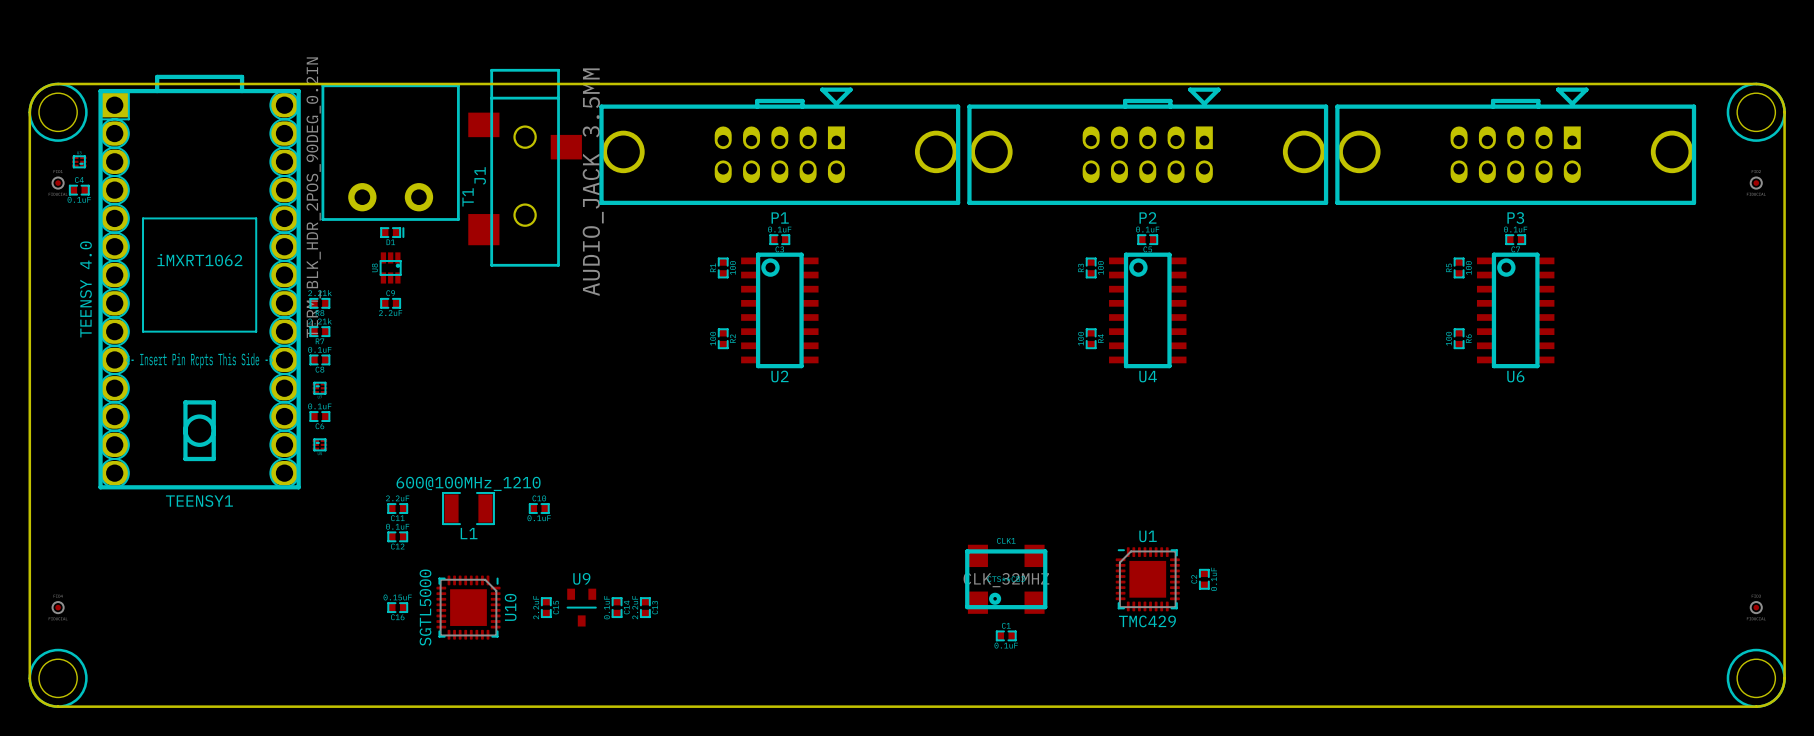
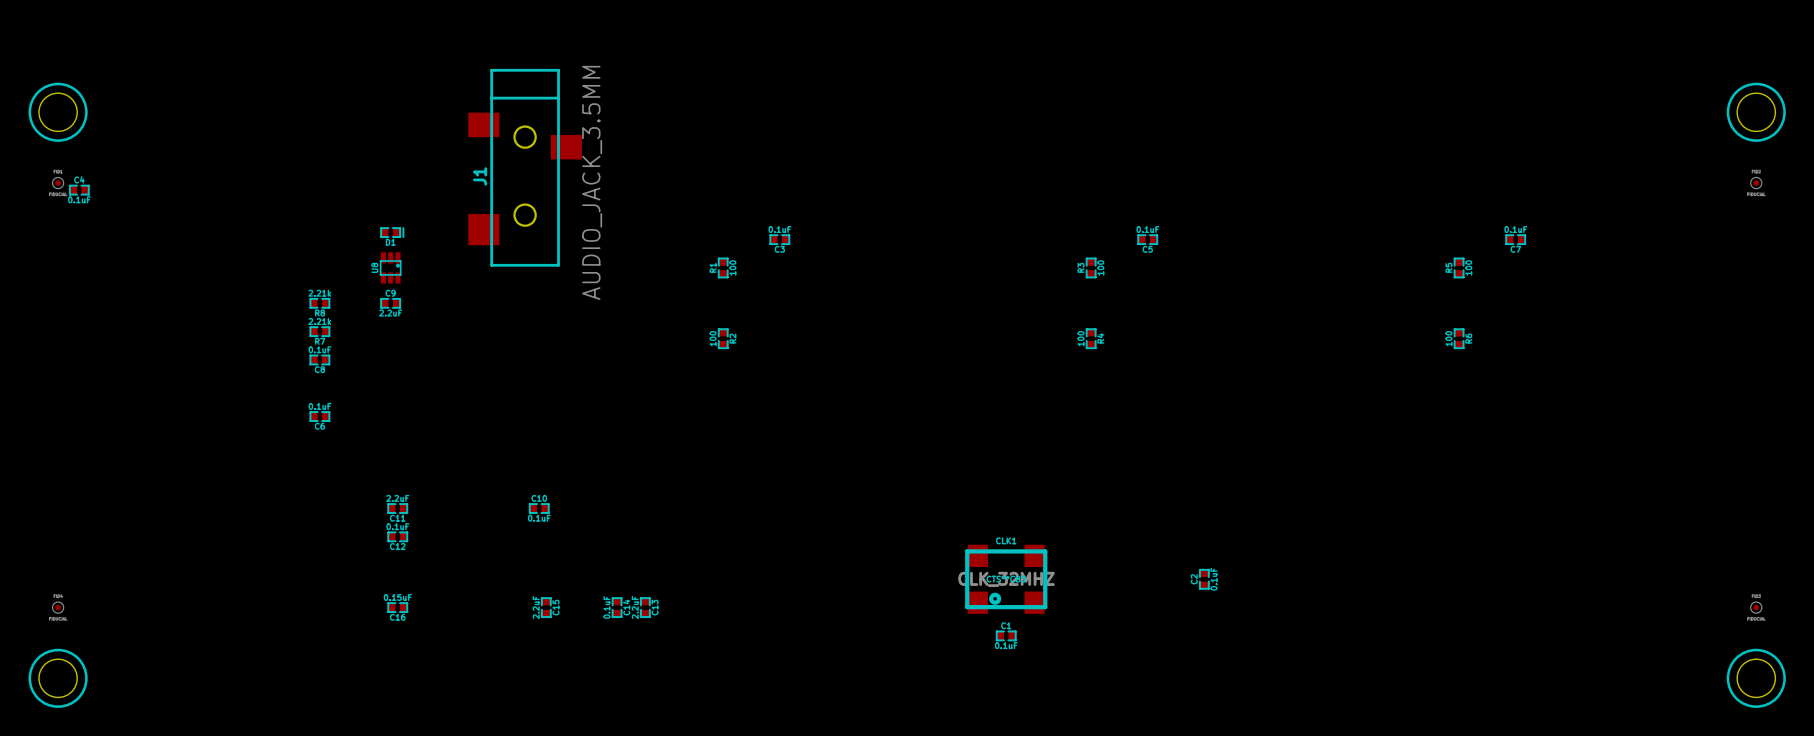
board edge: (58, 83) (1756, 83) (1767, 86) (1780, 98) (1784, 112) (1784, 678) (1782, 689) (1773, 700) (1756, 706) (58, 706) (47, 704) (35, 695) (29, 678) (29, 112) (31, 101) (38, 92) (47, 86) (58, 83) -> none
P1: (779, 146) -> none
P2: (1147, 146) -> none
P3: (1515, 146) -> none
T1: TERM_BLK_HDR_2POS_90DEG_0.2IN (390, 152) -> none
part: (79, 161) -> none
TEENSY1: (199, 282) -> none
U2: (779, 310) -> none
U4: (1147, 310) -> none
U6: (1515, 310) -> none
part: (319, 388) -> none
part: (319, 444) -> none
L1: 600@100MHz_1210 (468, 508) -> none
U1: TMC429 (1147, 579) -> none
U10: SGTL5000 (468, 607) -> none
U9: (581, 607) -> none

